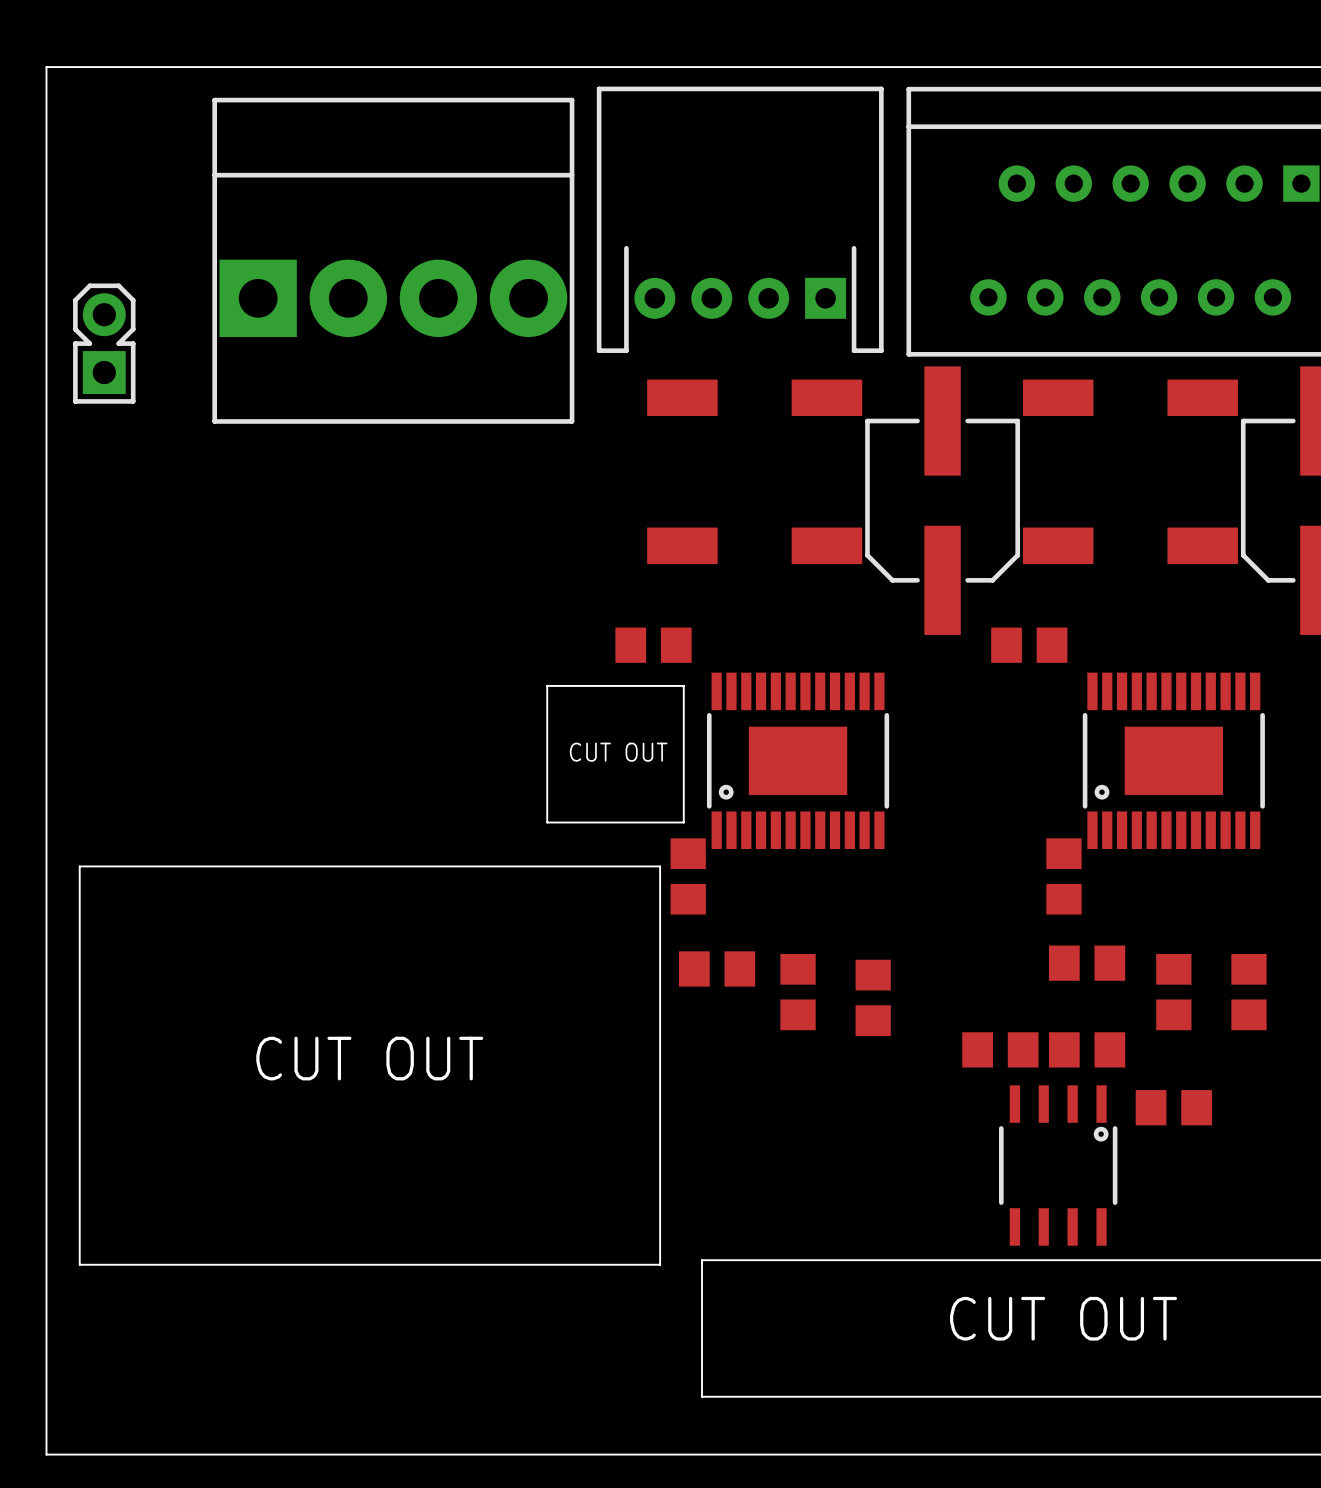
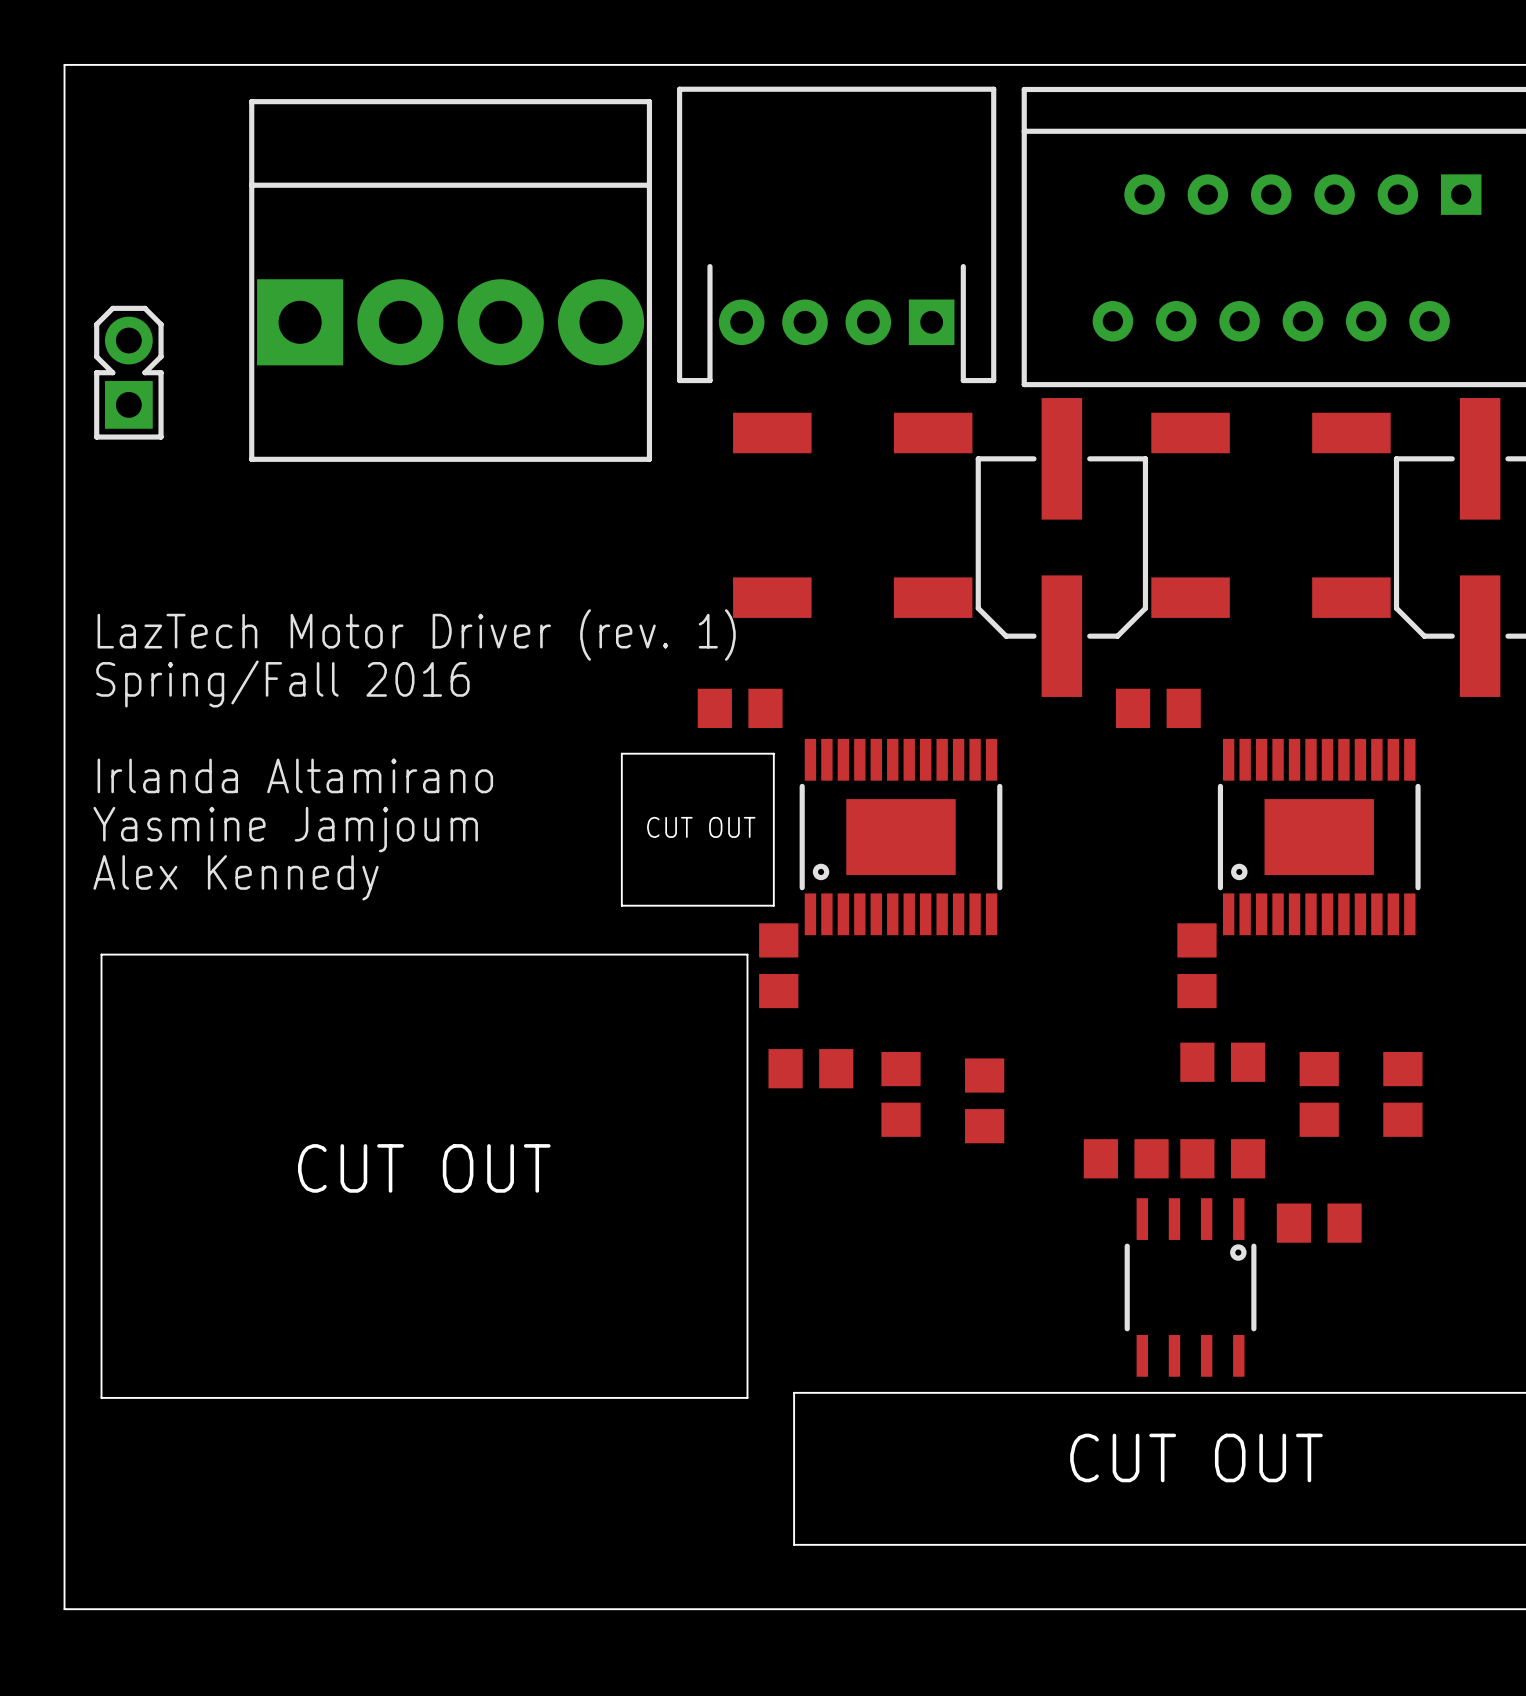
text: none -> LazTech Motor Driver (rev. 1) (416, 634)
text: none -> Spring/Fall 2016 (282, 684)
text: none -> Irlanda Altamirano (295, 775)
text: none -> Yasmine Jamjoum (285, 829)
text: none -> Alex Kennedy (236, 877)

